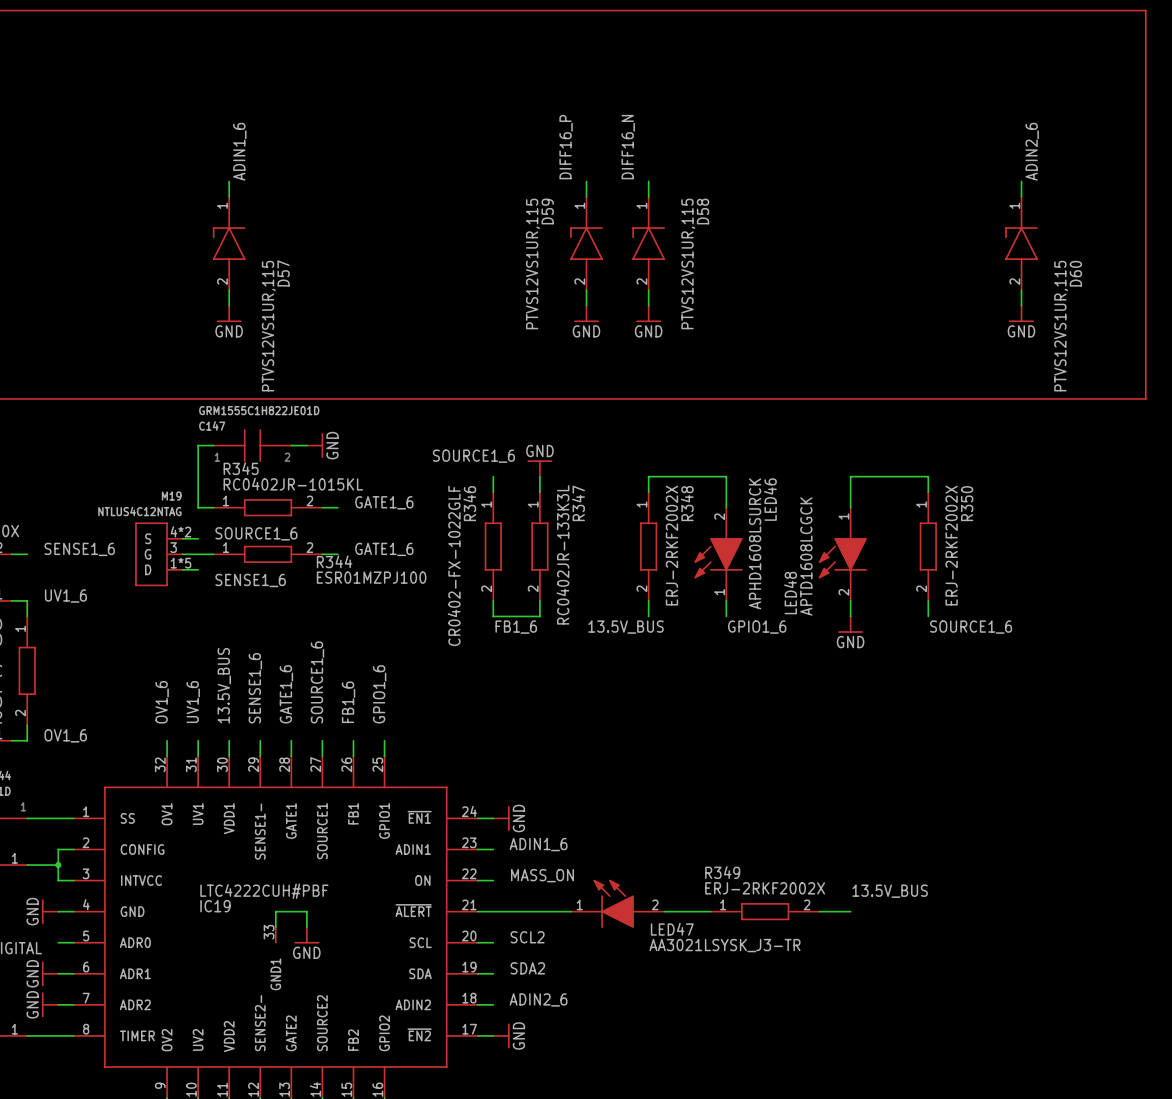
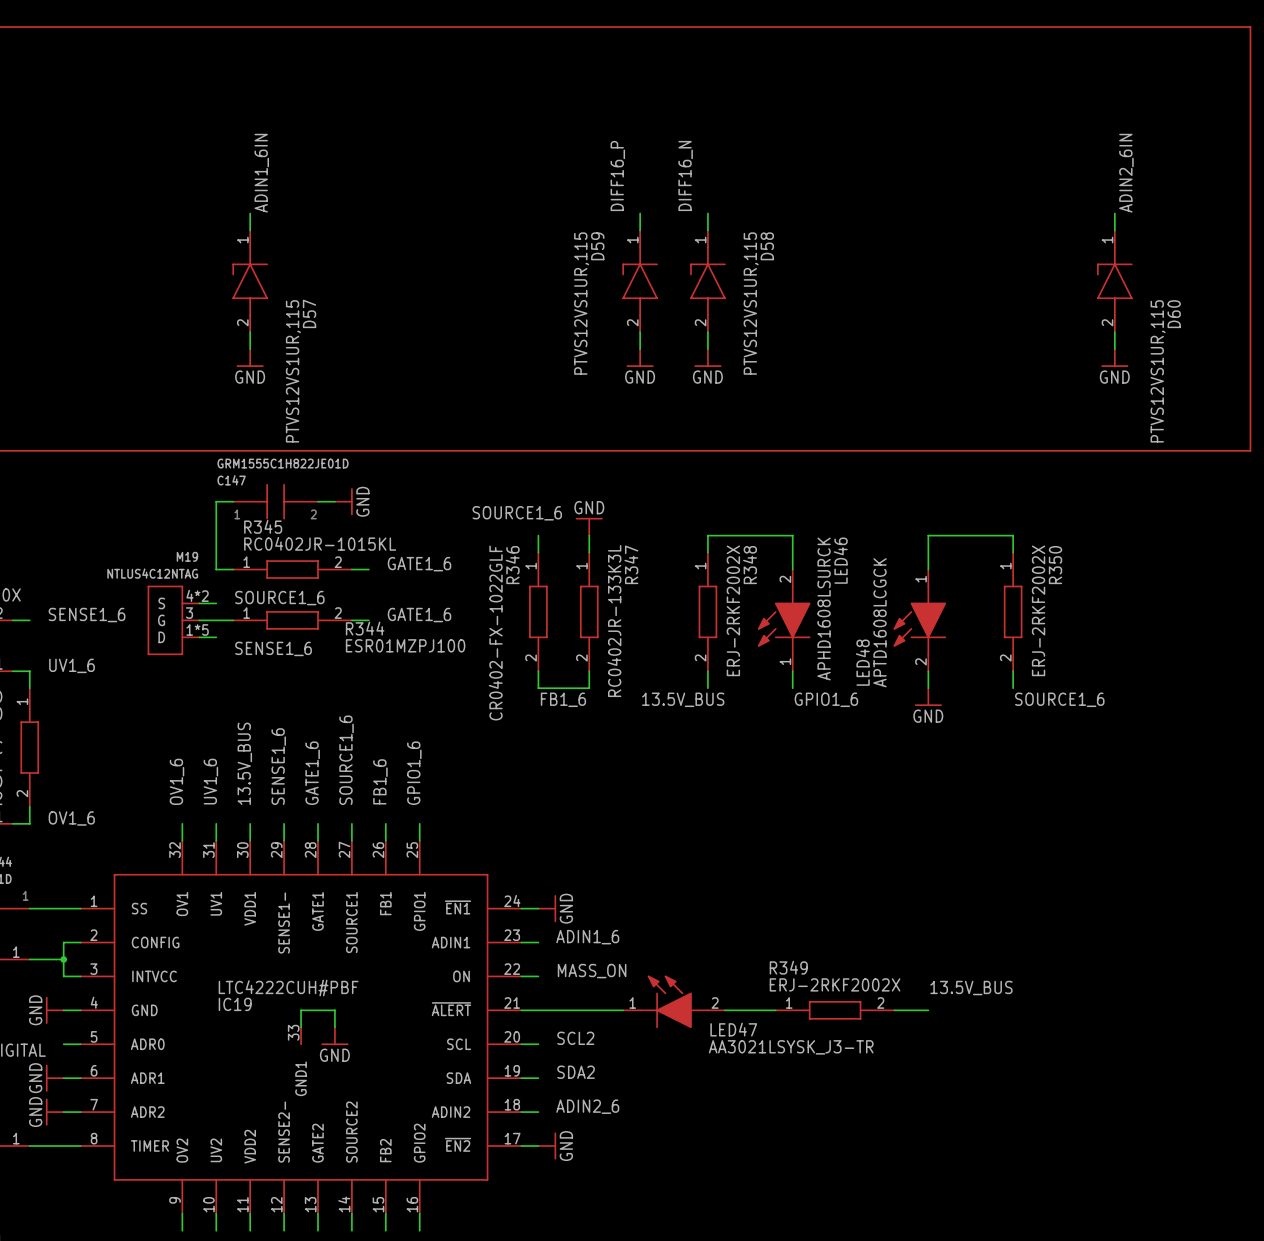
label: ADIN1_6 (239, 151) -> ADIN1_6IN (261, 173)
label: ADIN2_6 (1032, 151) -> ADIN2_6IN (1126, 173)

